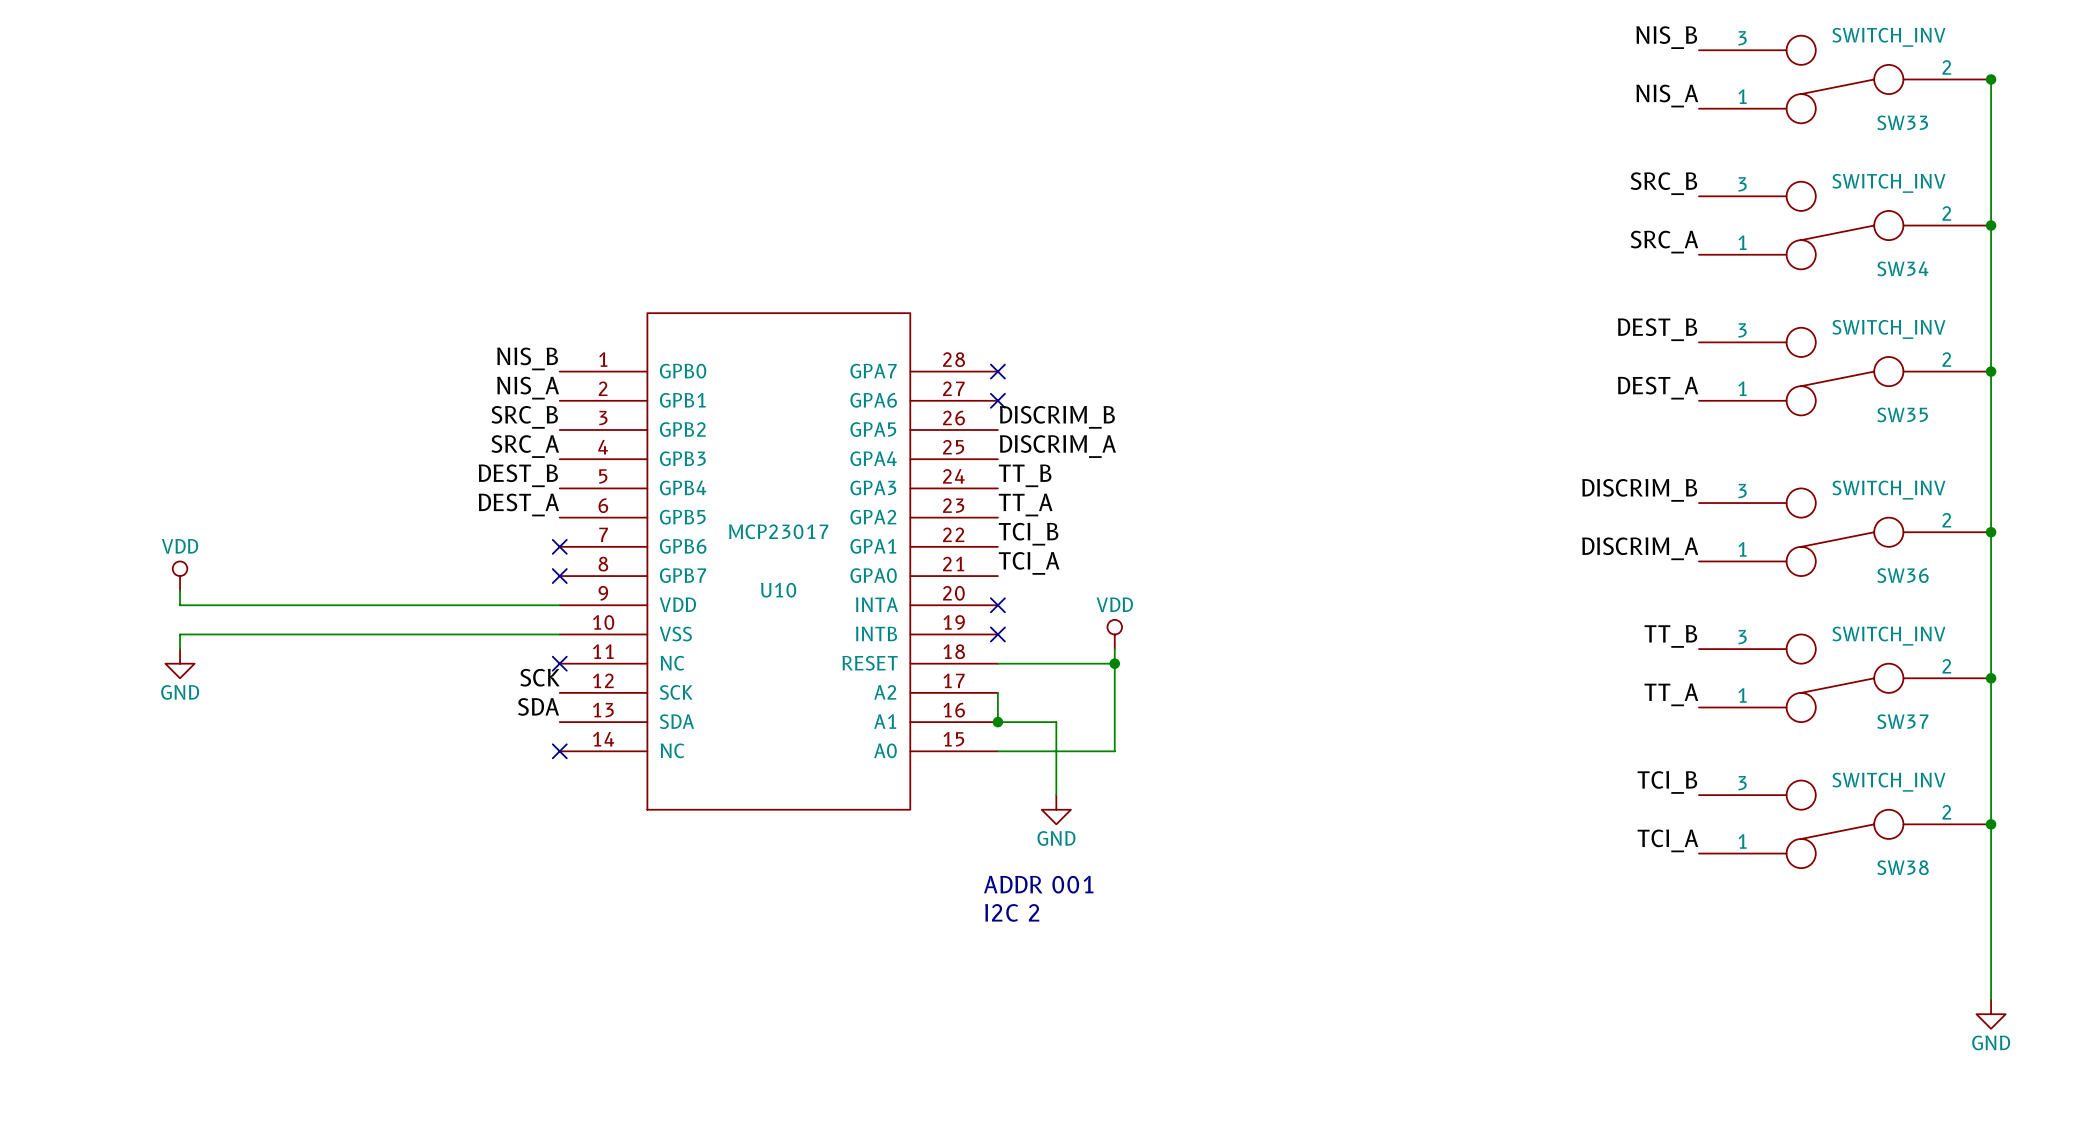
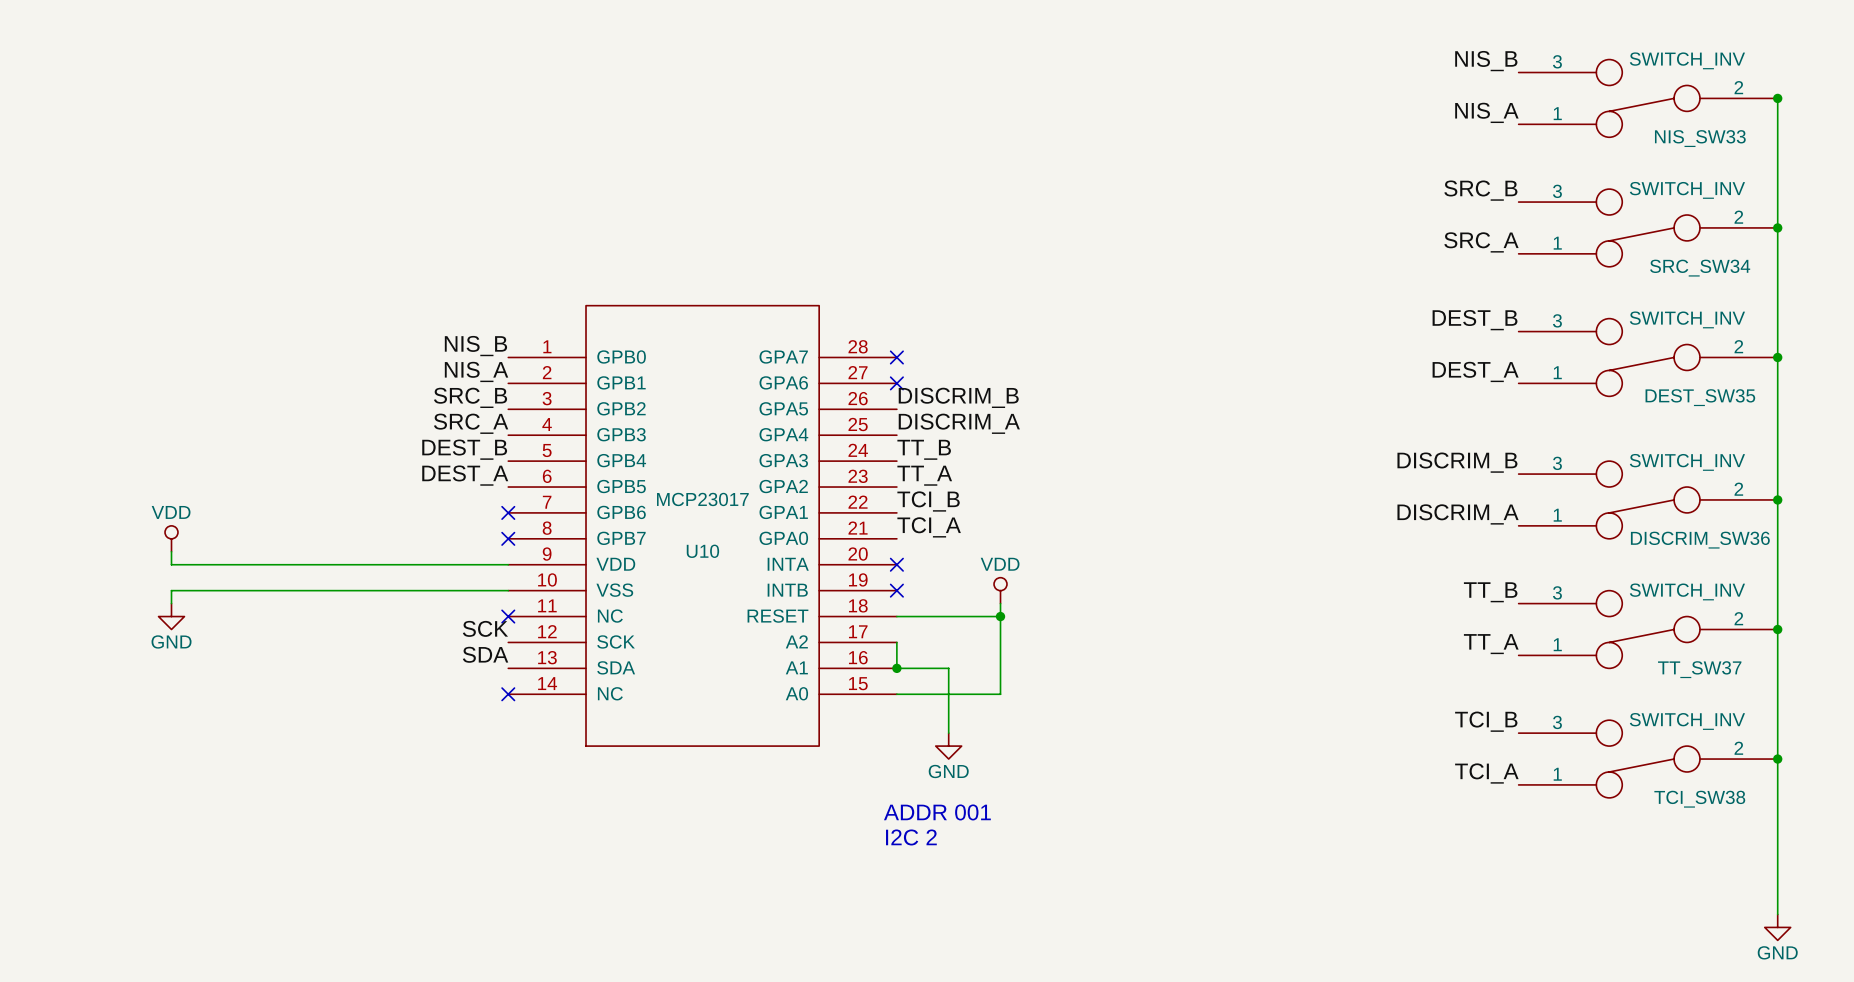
SW33 name: SW33 (1902, 122) -> NIS_SW33 (1700, 138)
SW34 name: SW34 (1902, 268) -> SRC_SW34 (1700, 268)
SW35 name: SW35 (1902, 414) -> DEST_SW35 (1700, 397)
SW36 name: SW36 (1902, 575) -> DISCRIM_SW36 (1700, 540)
SW37 name: SW37 (1902, 721) -> TT_SW37 (1699, 669)
SW38 name: SW38 (1903, 867) -> TCI_SW38 (1699, 799)

